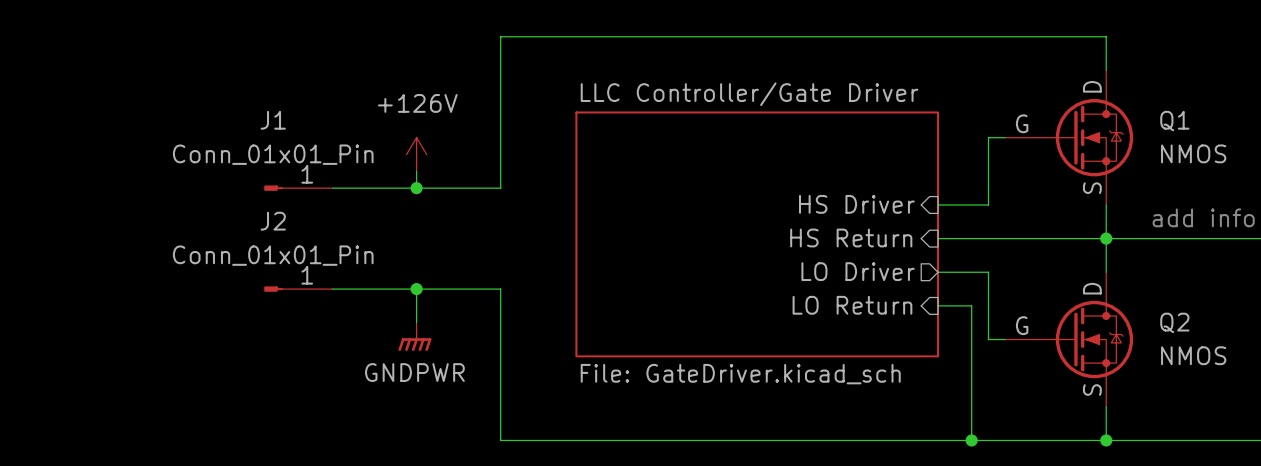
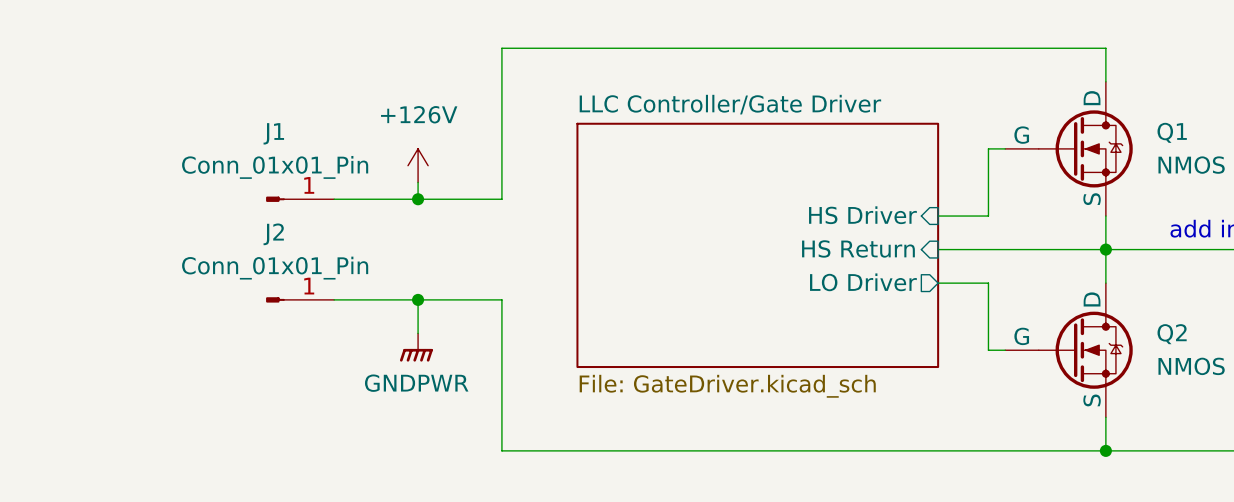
sheet pin: LO Return (852, 305) -> none
wire: (938, 305) (971, 305) (971, 440) -> none
junction: (971, 440) -> none

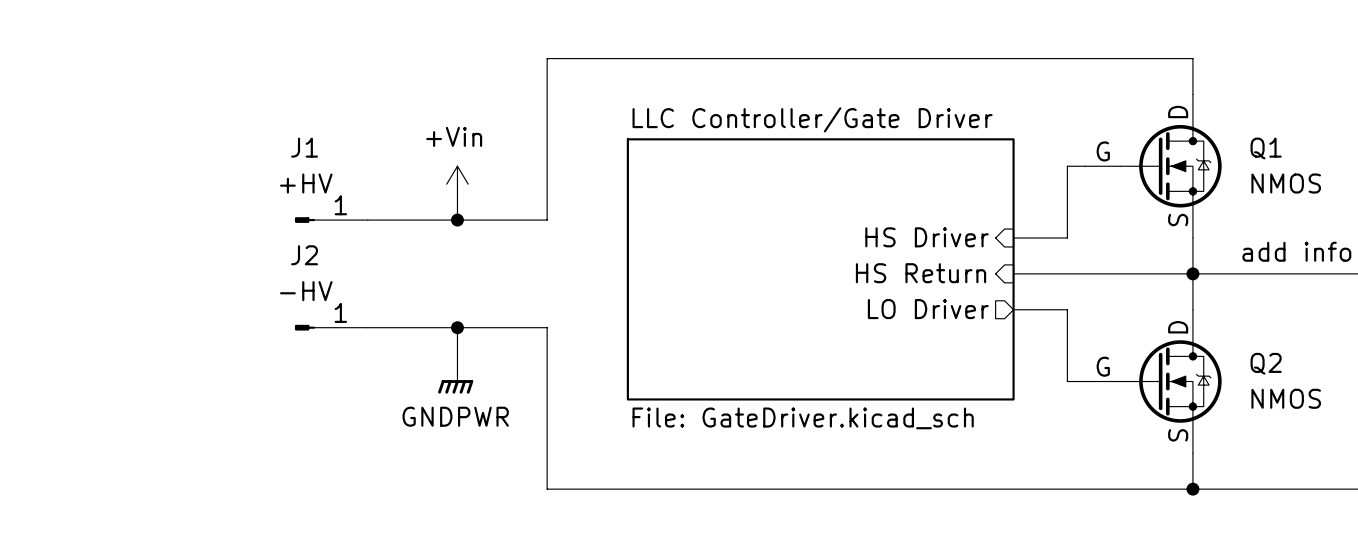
power symbol: +126V (418, 165) -> +Vin (457, 184)
J1 value: Conn_01x01_Pin (275, 167) -> +HV (306, 183)
J2 value: Conn_01x01_Pin (275, 268) -> -HV (306, 291)

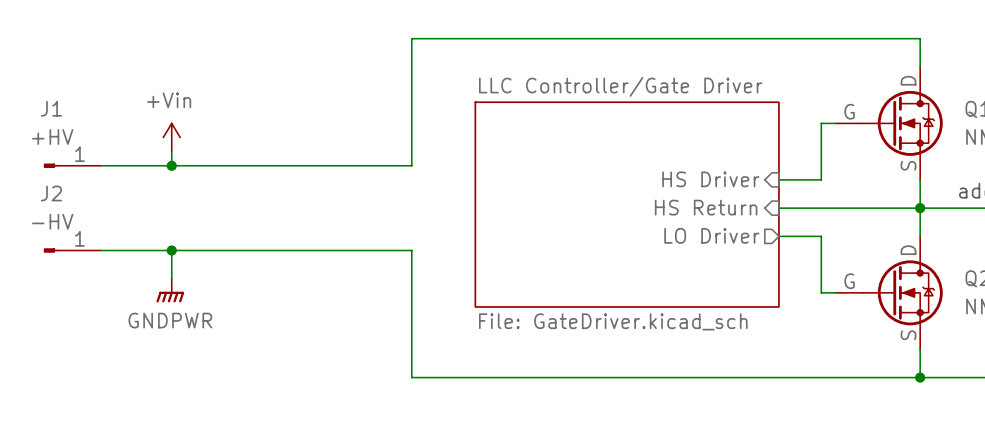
power symbol position: +Vin (457, 184) -> +Vin (171, 137)
wire: (457, 202) (457, 220) -> (171, 151) (171, 165)
wire: none -> (101, 165) (270, 165)
junction: none -> (171, 165)
J1 position: (331, 220) -> (72, 165)
junction: (457, 220) -> none
wire: none -> (101, 250) (270, 250)
junction: none -> (171, 250)
J2 position: (331, 327) -> (72, 250)
wire: (457, 327) (457, 363) -> (171, 250) (171, 278)
junction: (457, 327) -> none
power symbol position: GNDPWR (455, 378) -> GNDPWR (170, 290)

